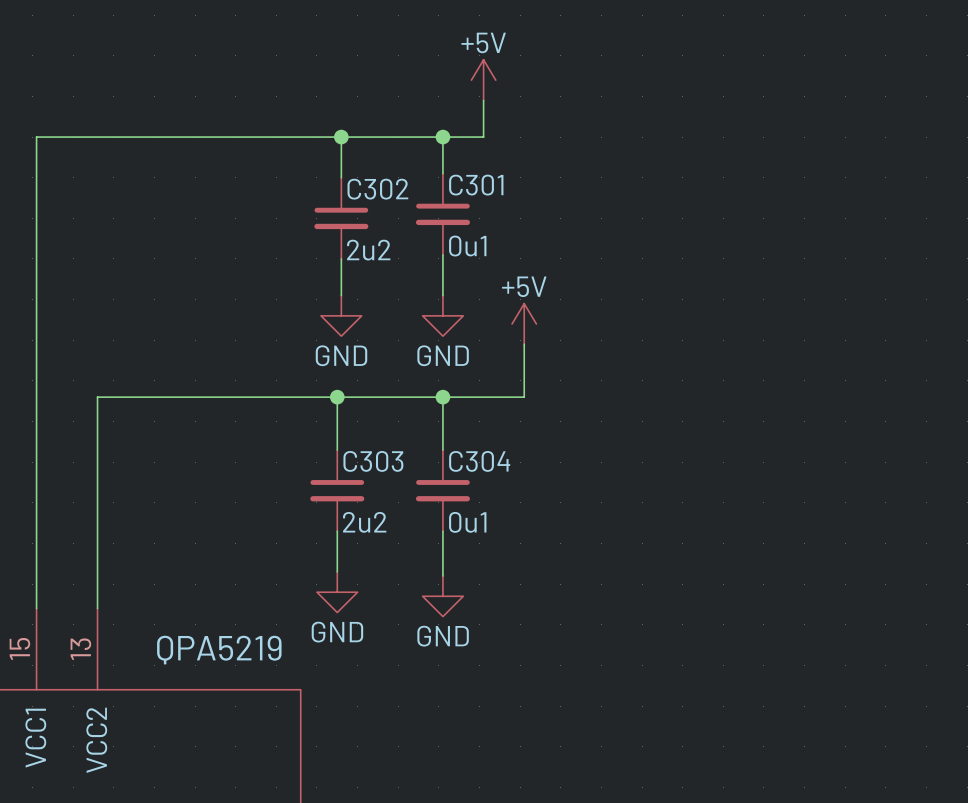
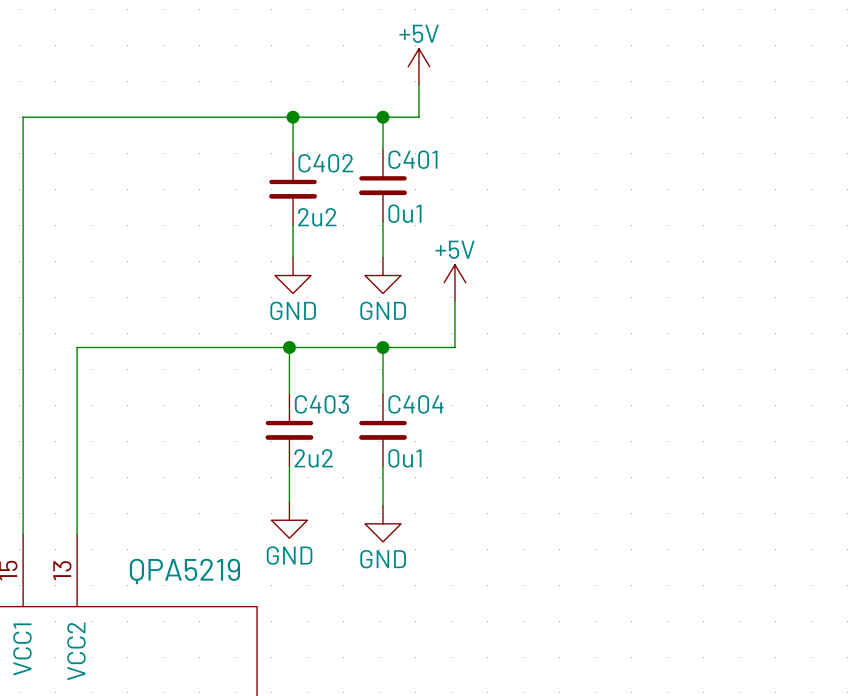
C301 name: C301 (476, 185) -> C401 (412, 159)
C302 name: C302 (377, 189) -> C402 (325, 163)
C303 name: C303 (373, 461) -> C403 (321, 404)
C304 name: C304 (479, 461) -> C404 (415, 404)

